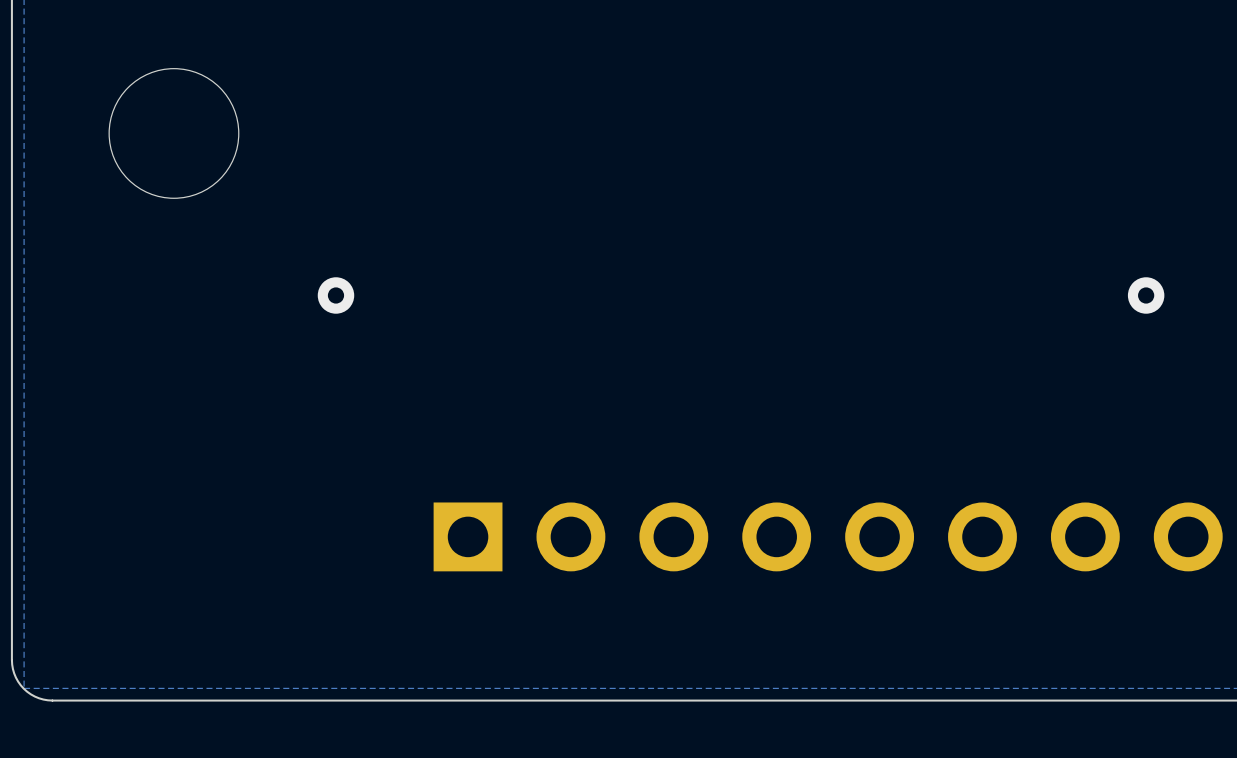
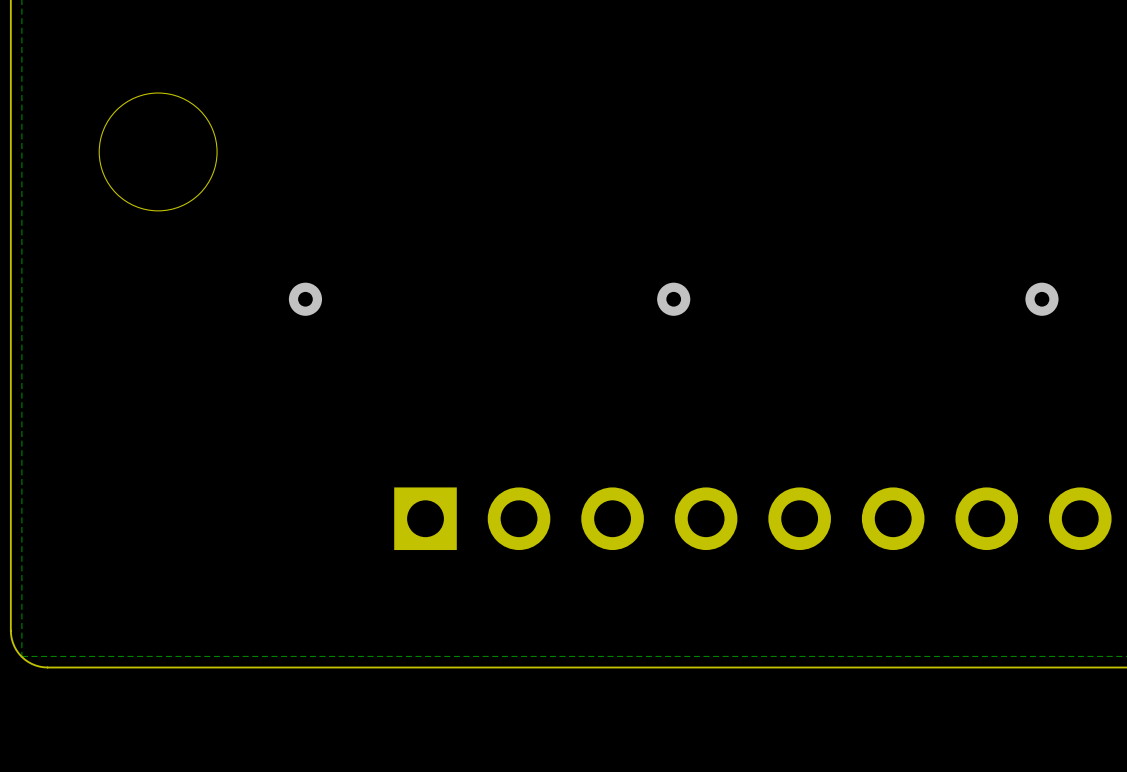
via: none -> (673, 299)

